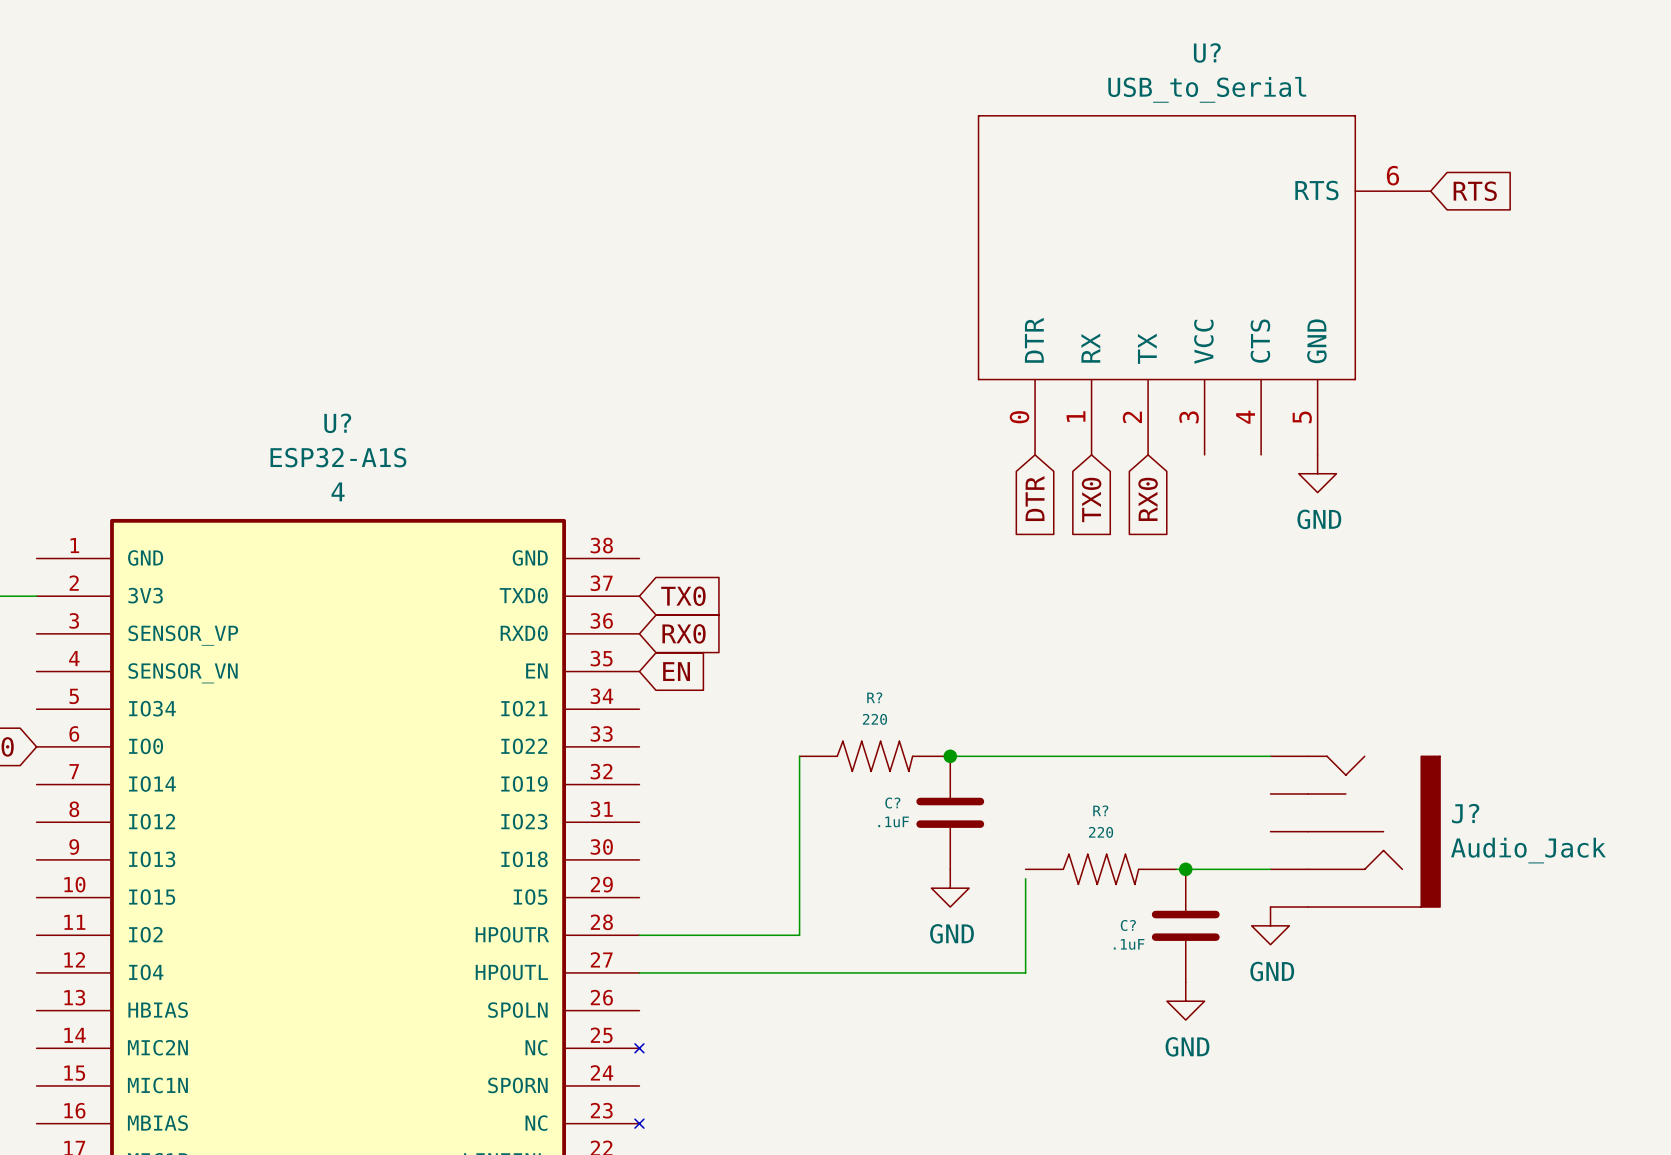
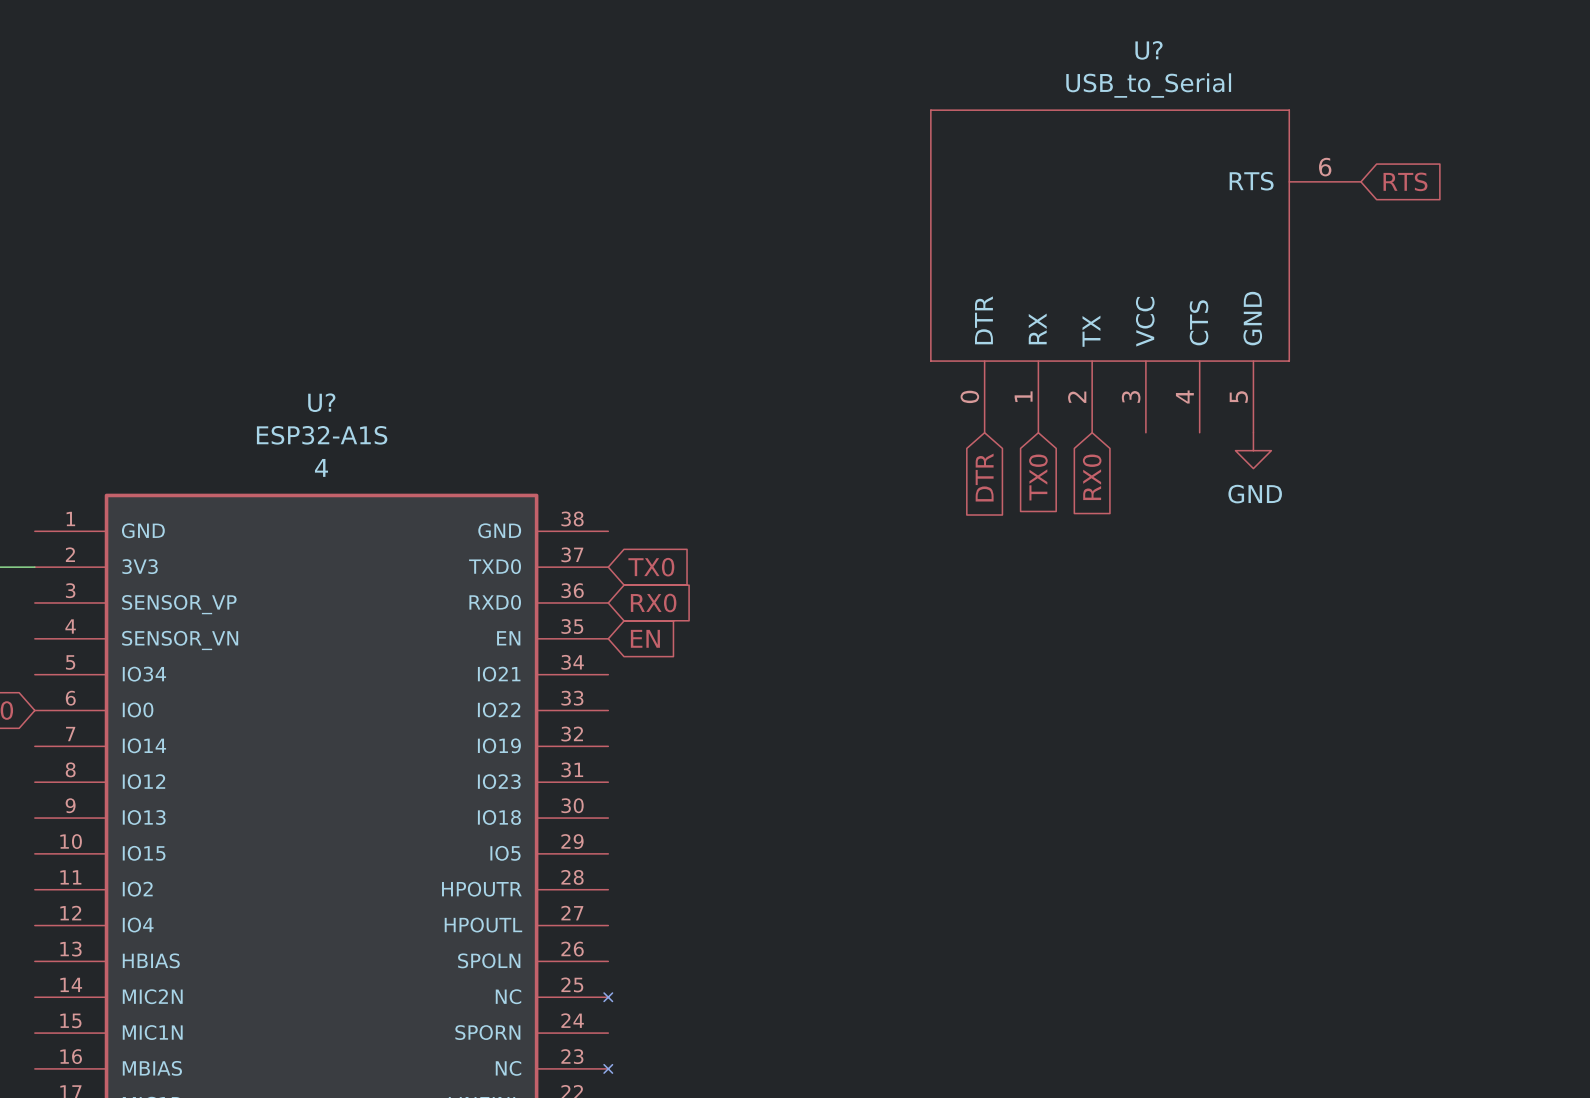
wire: (799, 756) (799, 935) (639, 935) -> none
R?: 220 (874, 756) -> none
wire: (950, 756) (1270, 756) -> none
junction: (950, 756) -> none
C?: .1uF (950, 812) -> none
J?: Audio_Jack (1355, 831) -> none
R?: 220 (1100, 869) -> none
wire: (1176, 869) (1270, 869) -> none
junction: (1185, 869) -> none
wire: (1025, 878) (1025, 972) (639, 972) -> none
power symbol: GND (950, 888) -> none
C?: .1uF (1185, 925) -> none
power symbol: GND (1270, 925) -> none
power symbol: GND (1185, 1001) -> none

